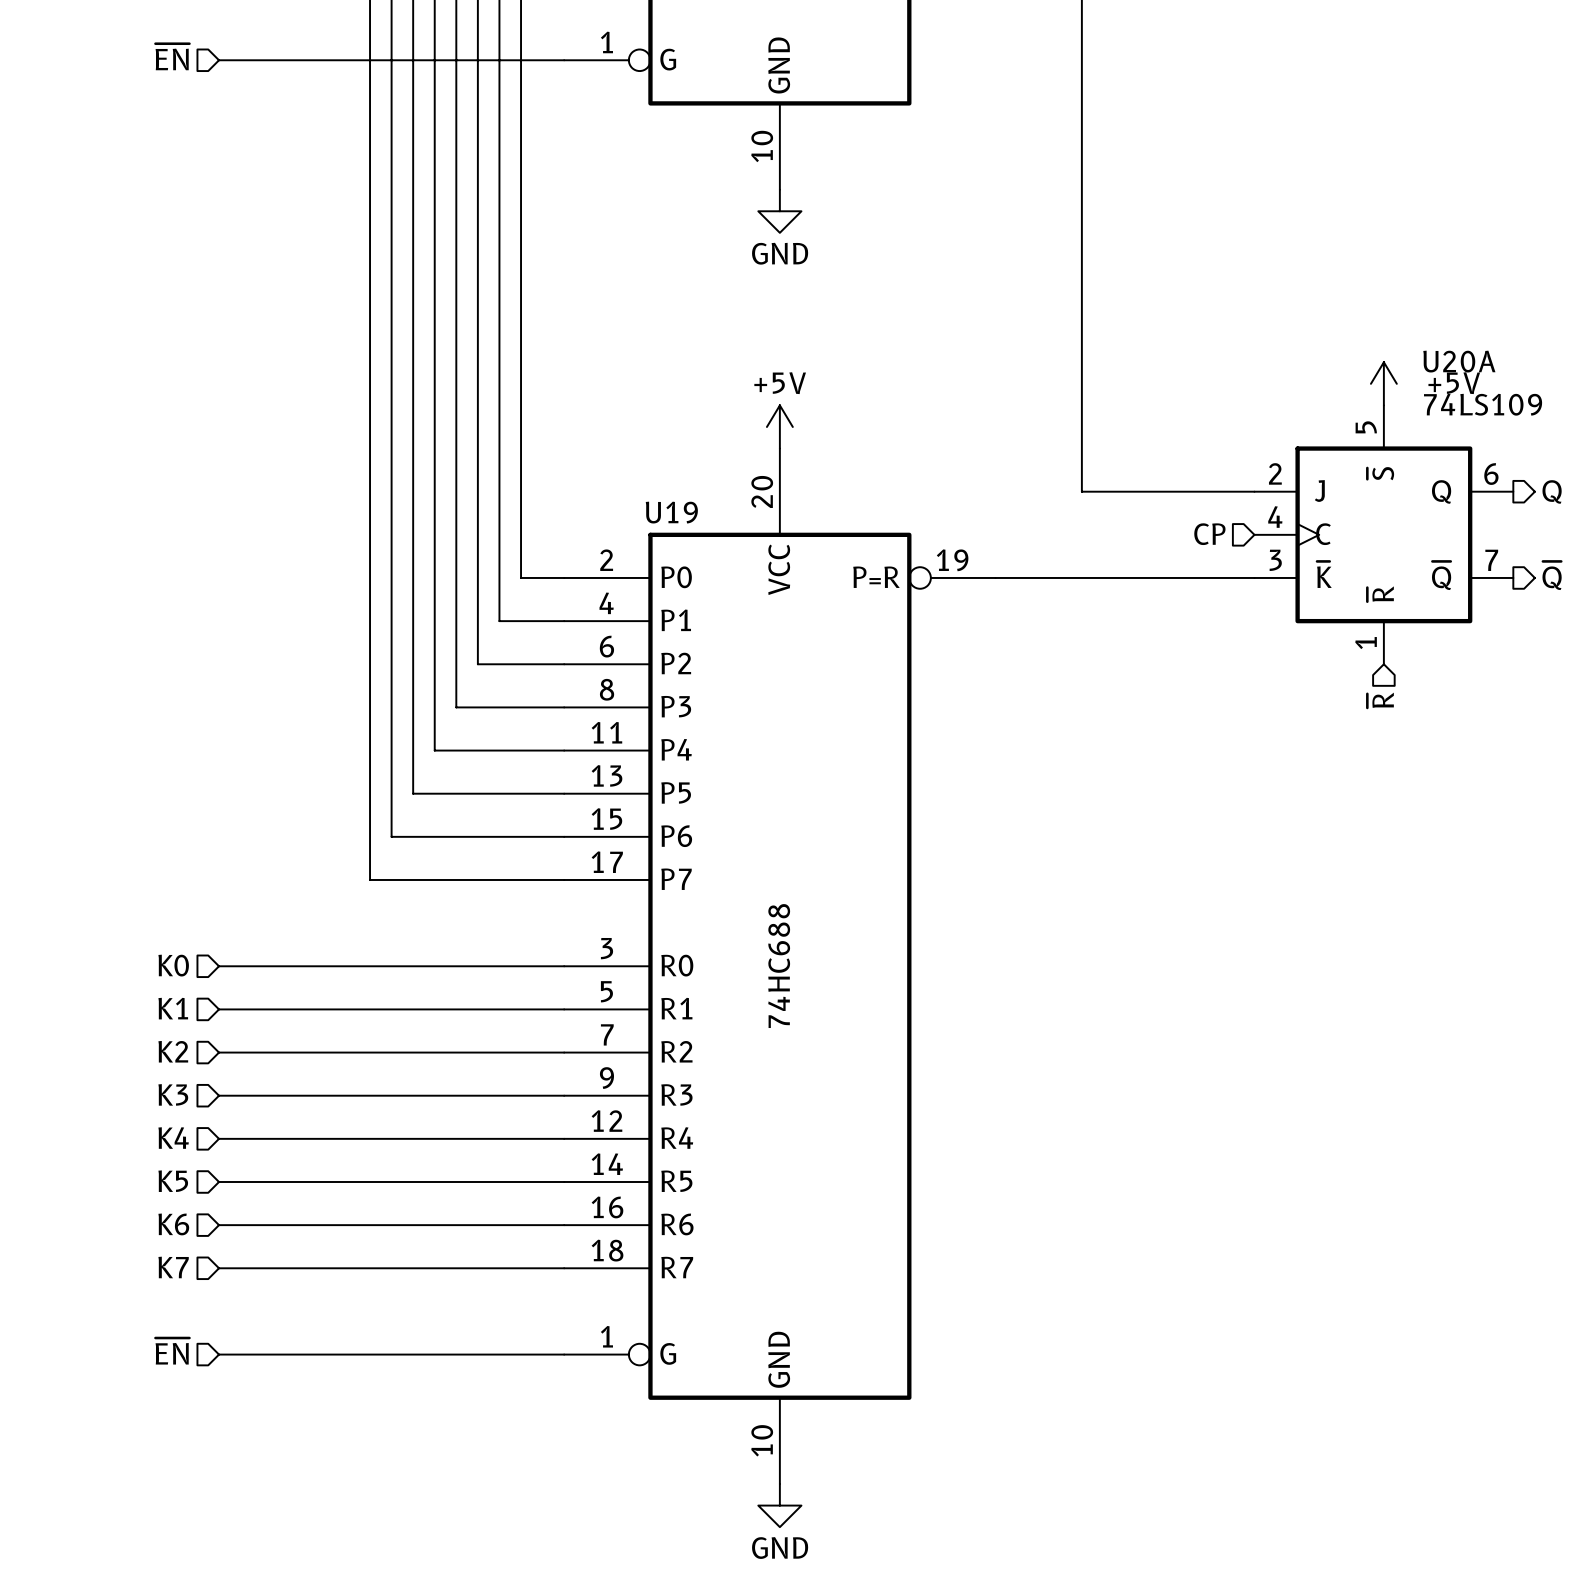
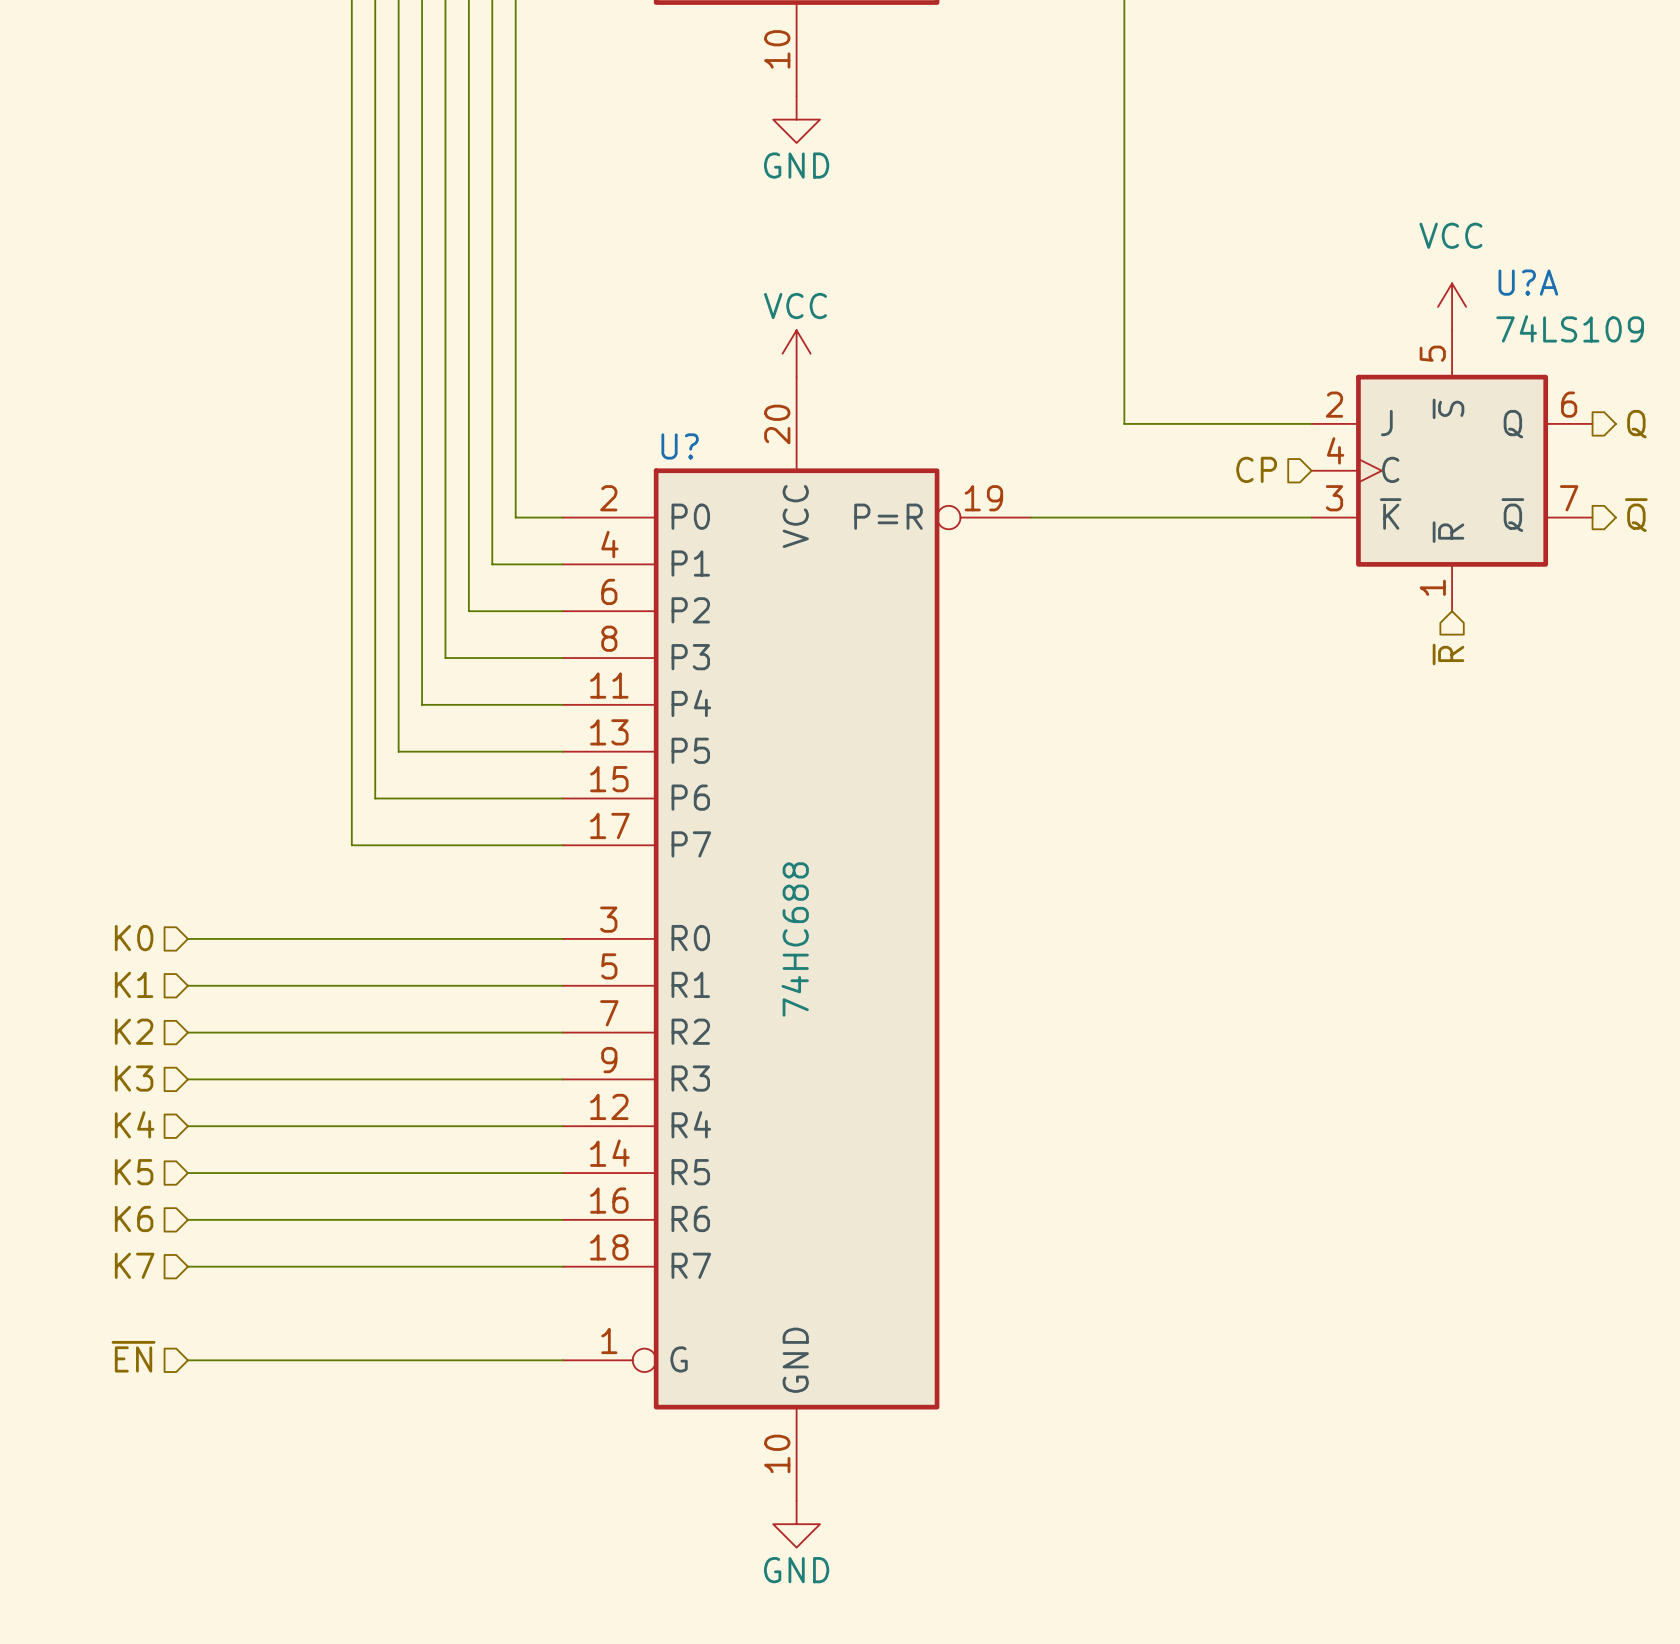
U20A name: U20A (1459, 361) -> U?A (1528, 282)
power symbol: +5V (1383, 383) -> VCC (1452, 306)
power symbol: +5V (779, 426) -> VCC (796, 353)
U19 name: U19 (671, 512) -> U? (680, 446)

